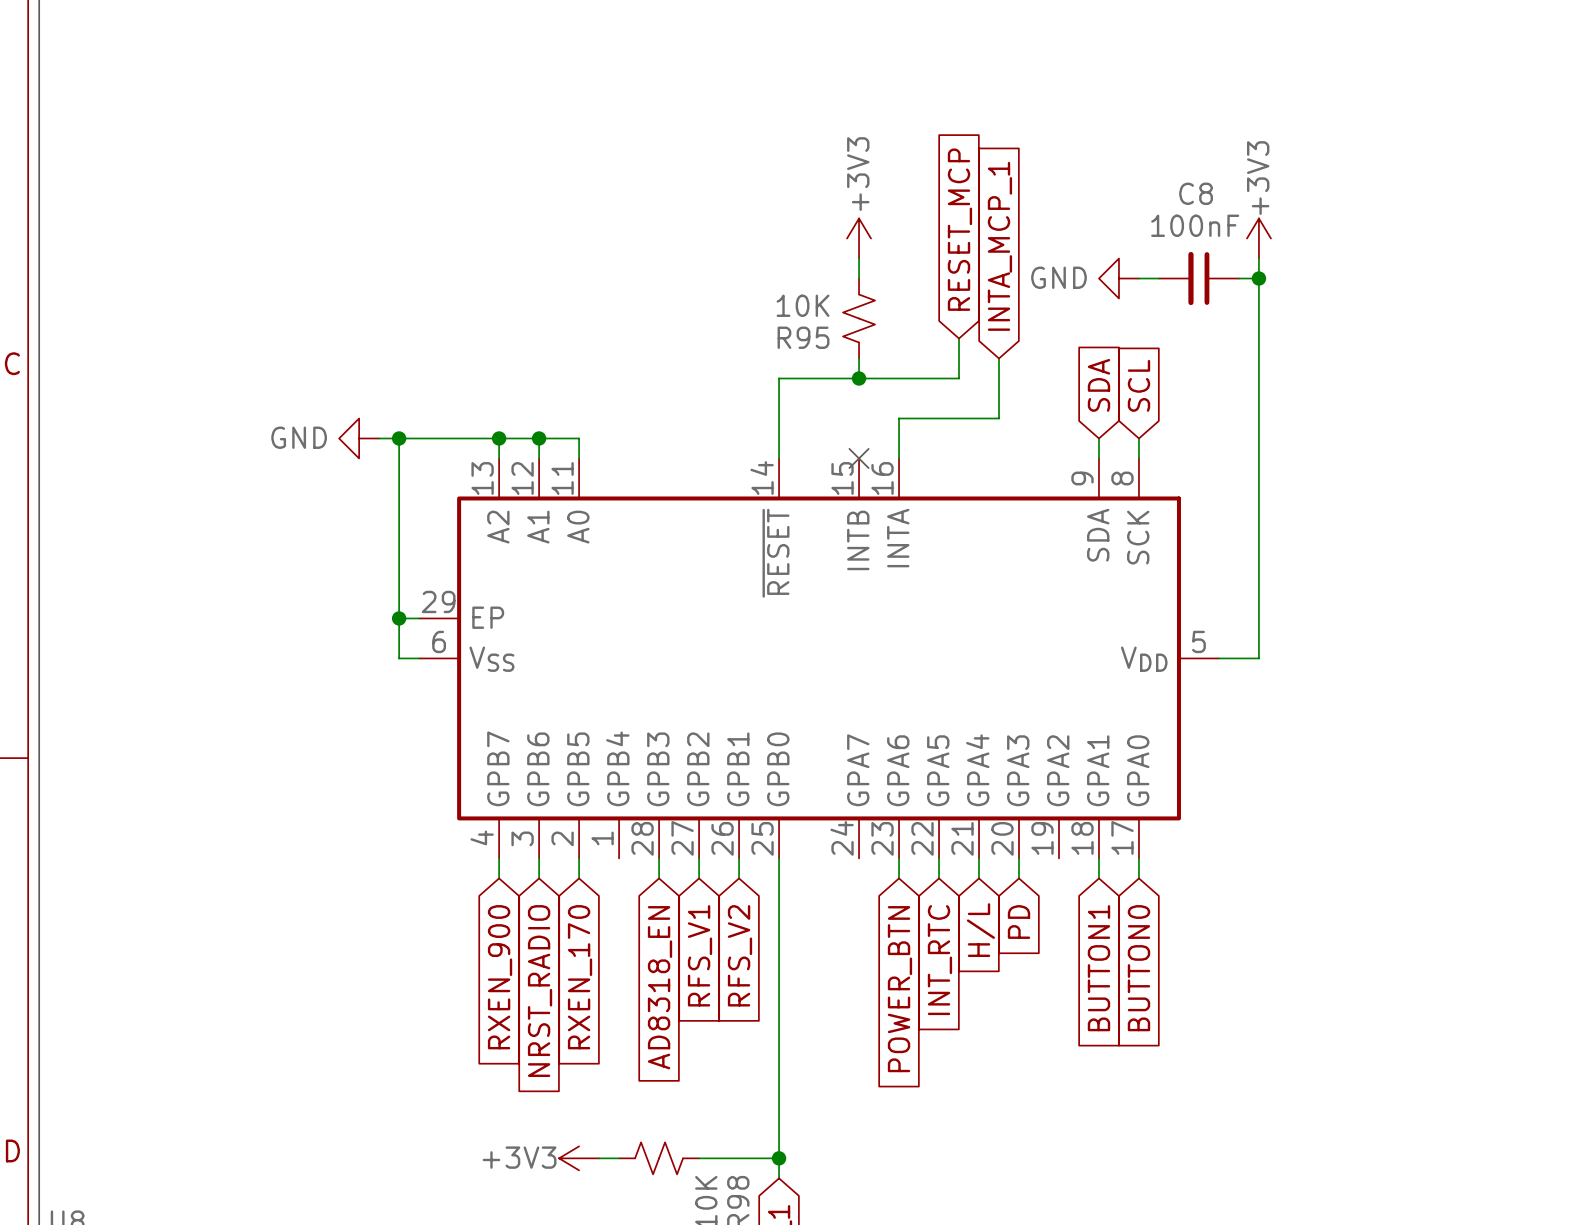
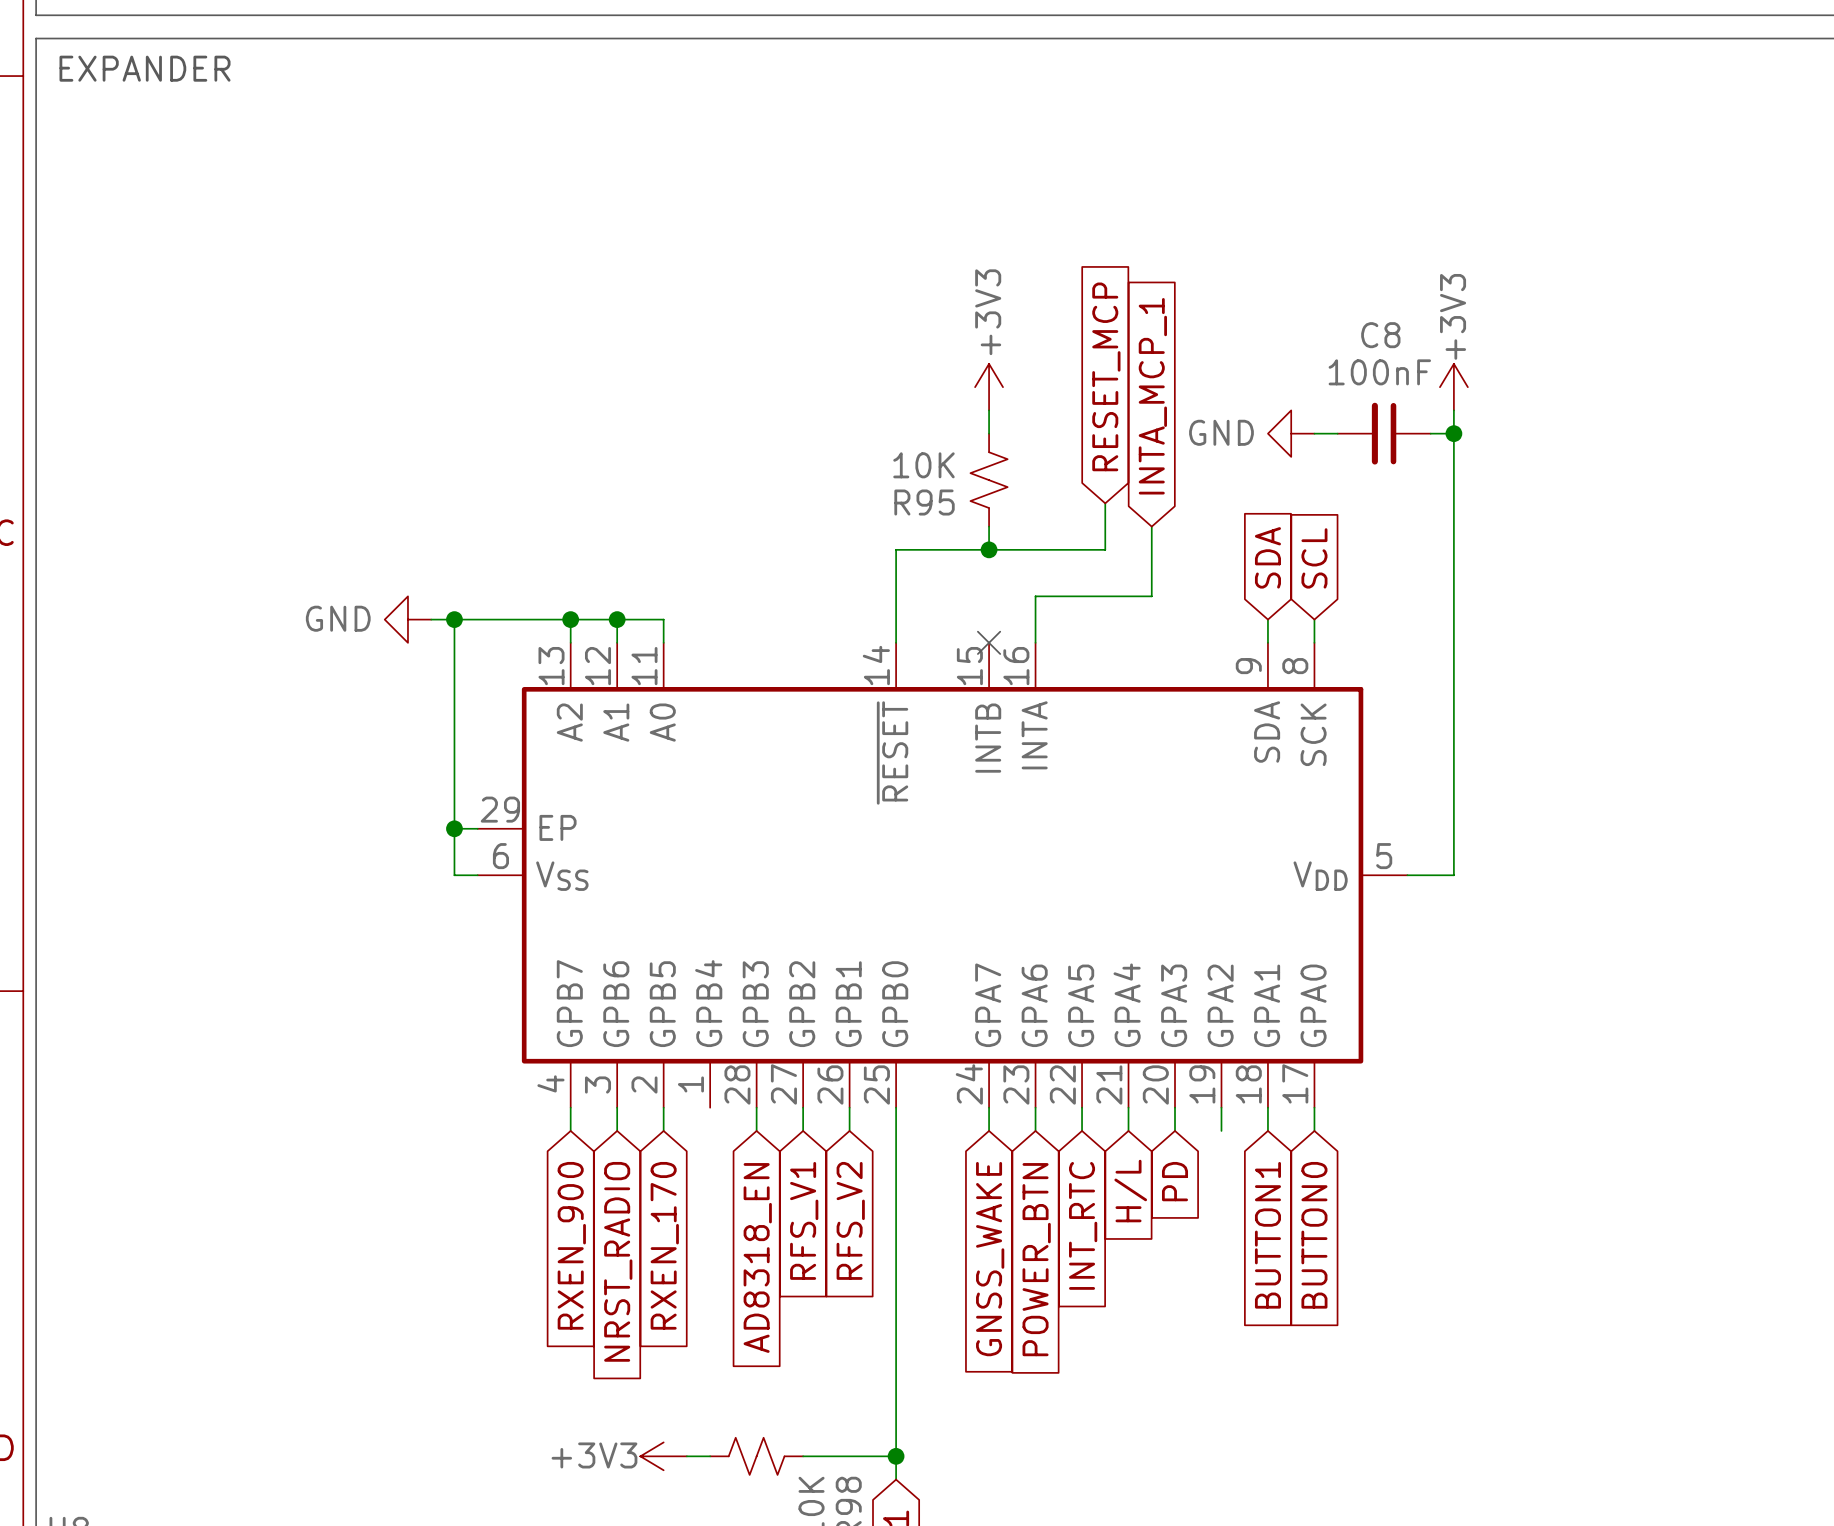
wire: none -> (989, 1107) (989, 1130)
wire: none -> (1221, 1107) (1221, 1130)
global label: none -> GNSS_WAKE (990, 1259)

